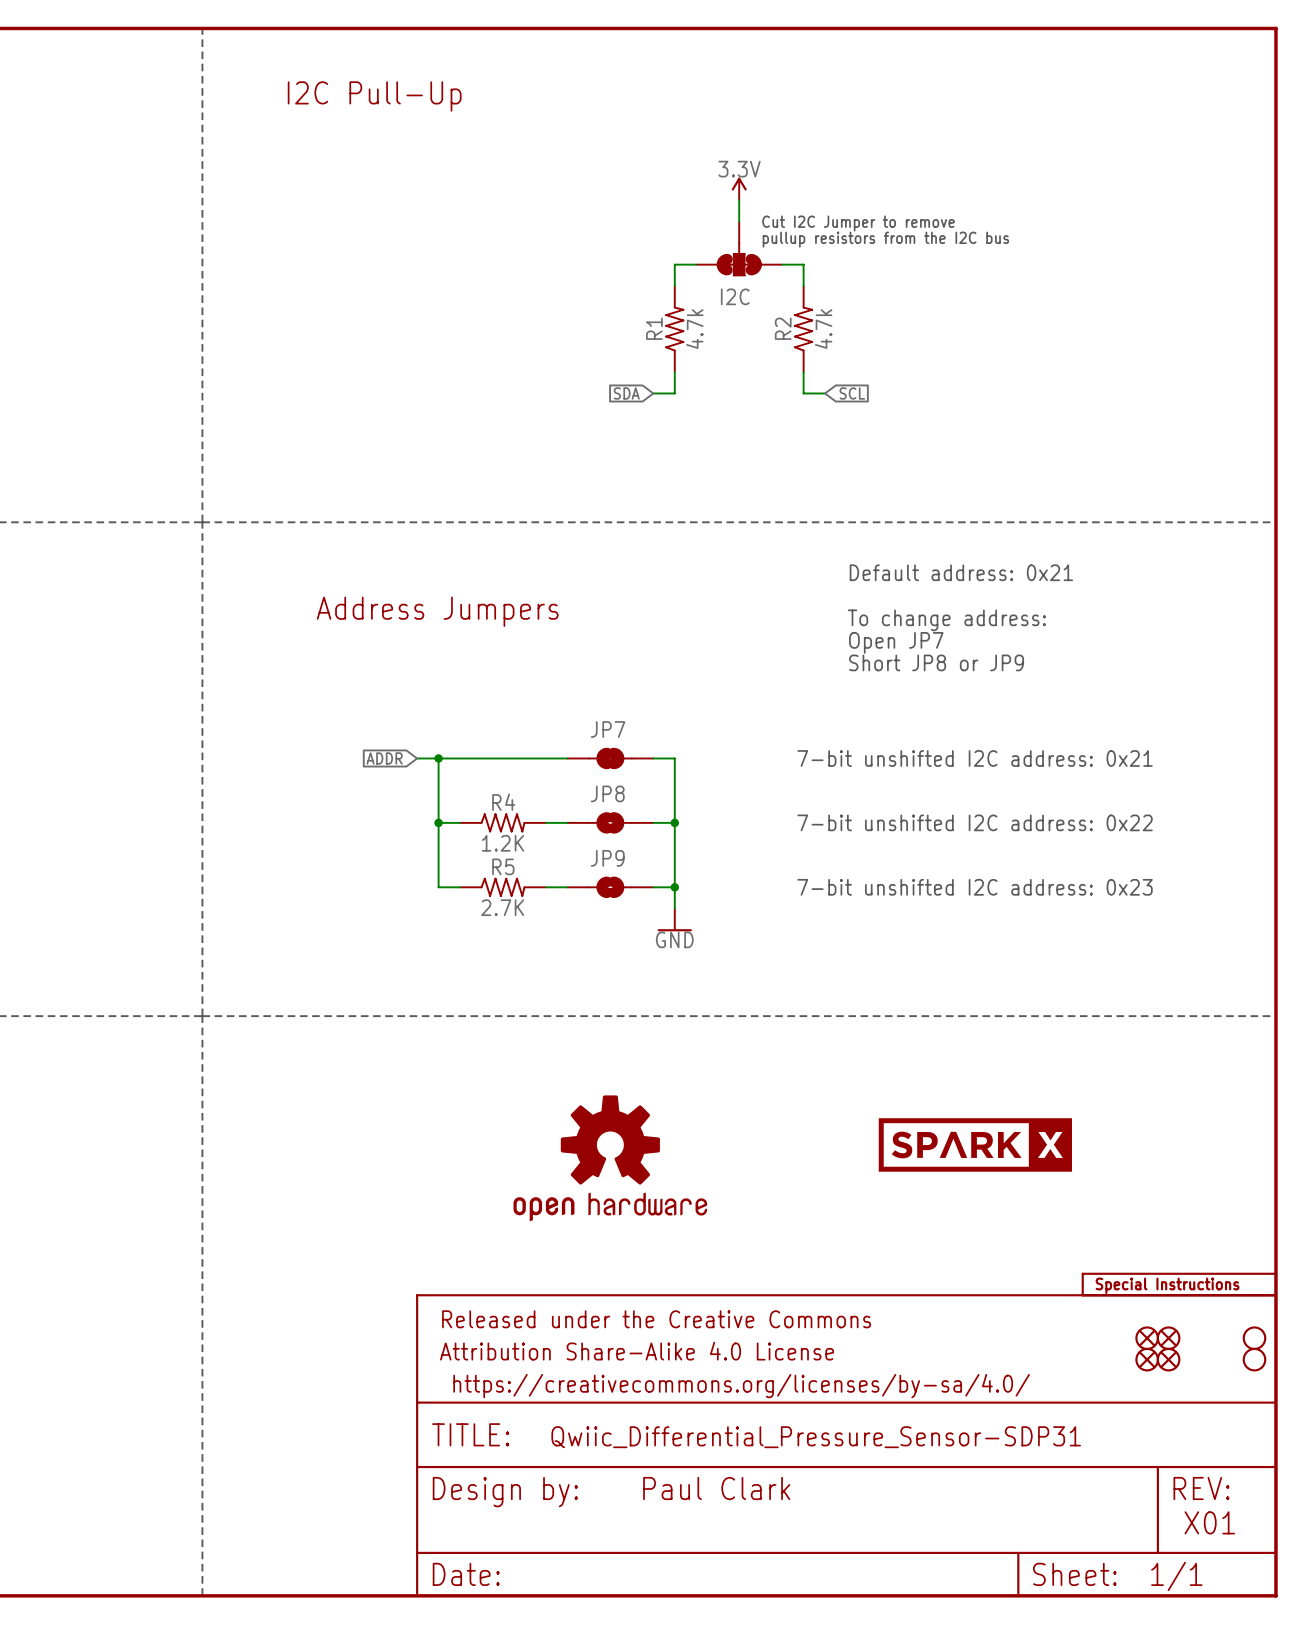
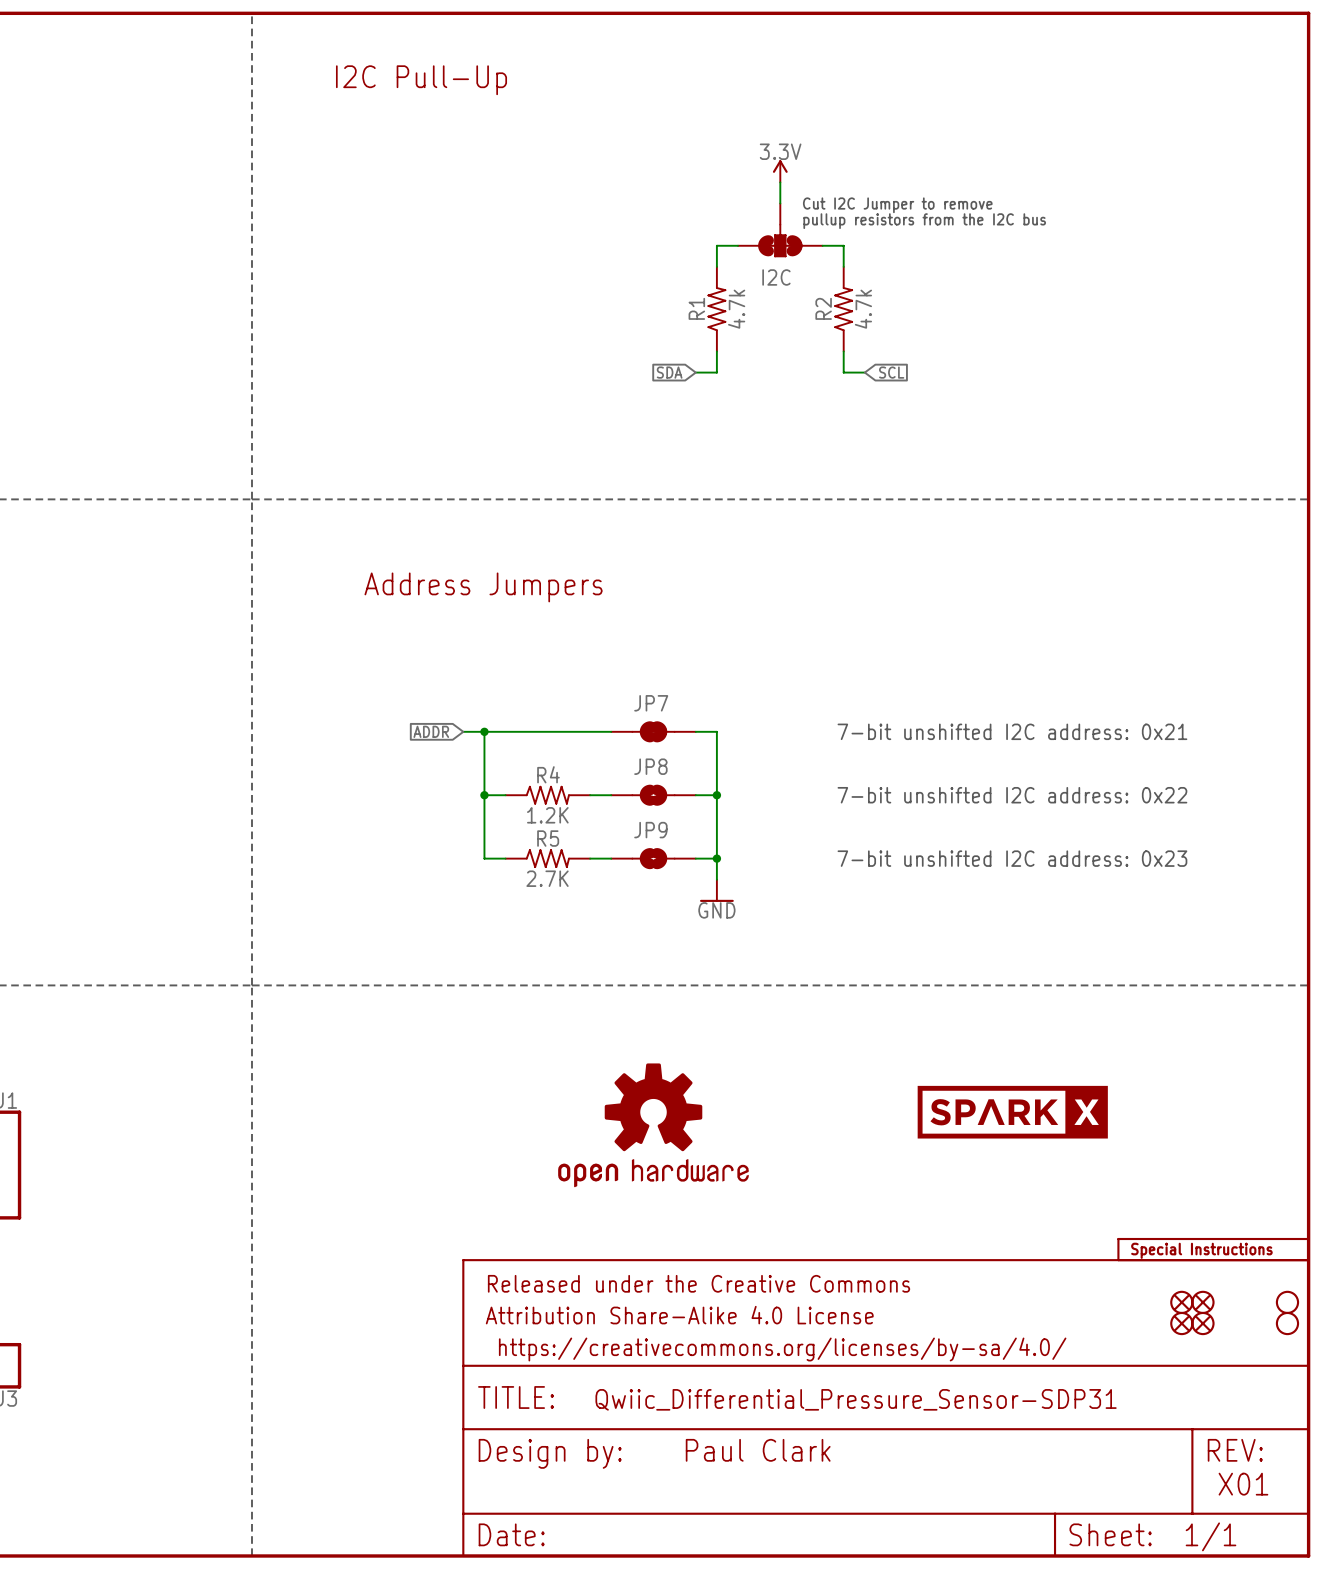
text: Default address: 0x21 (961, 572) -> none
text: To change address: (946, 620) -> none
text: Open JP7 (896, 642) -> none
text: Short JP8 or JP9 (936, 662) -> none

